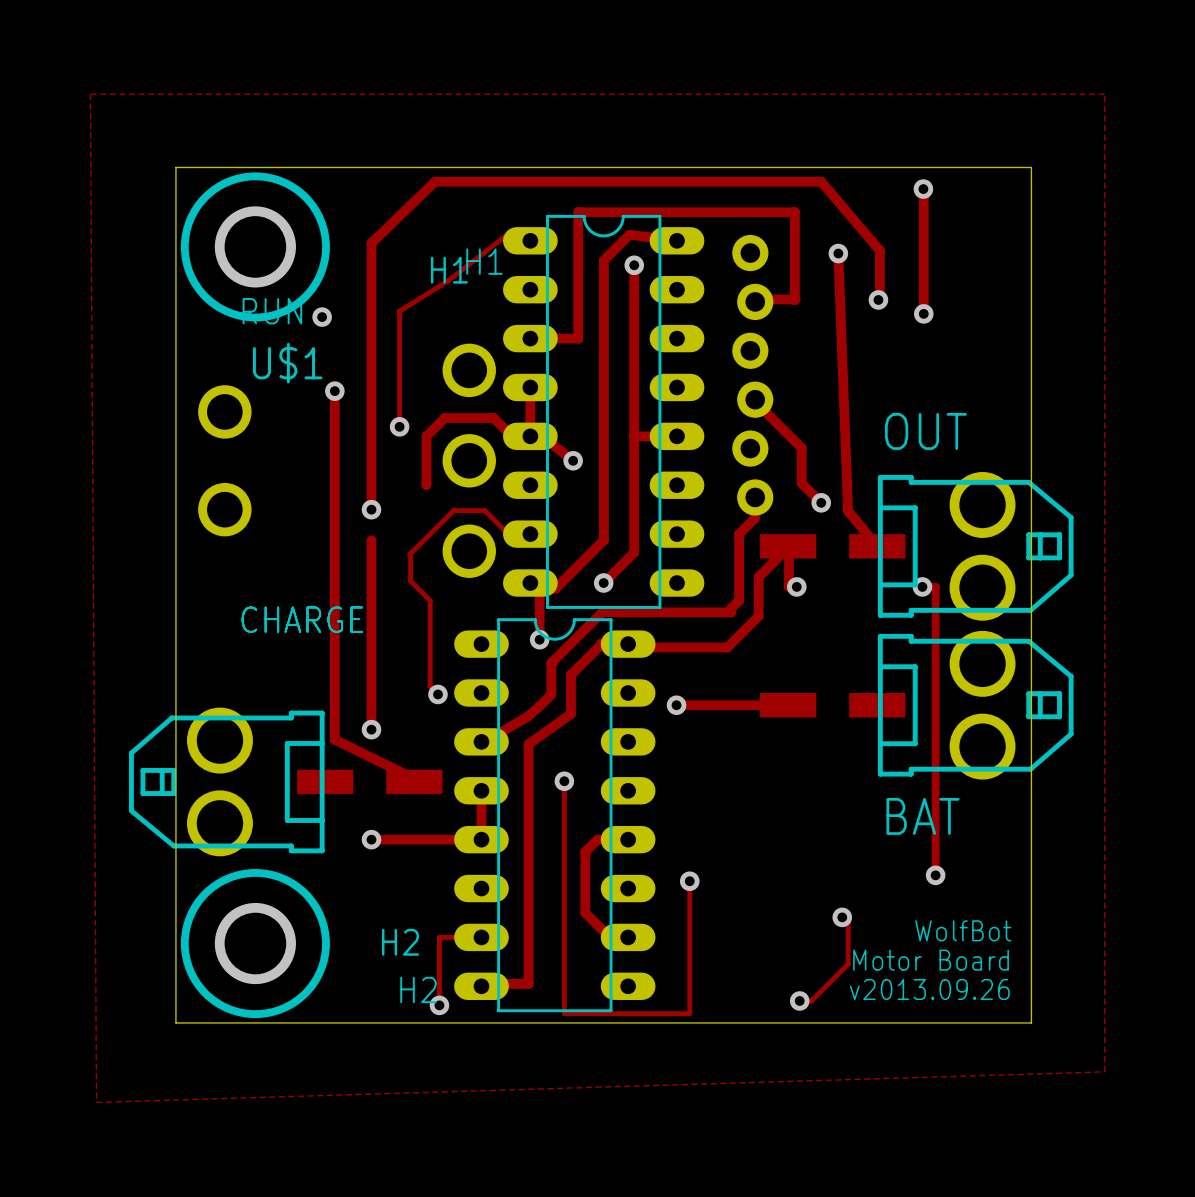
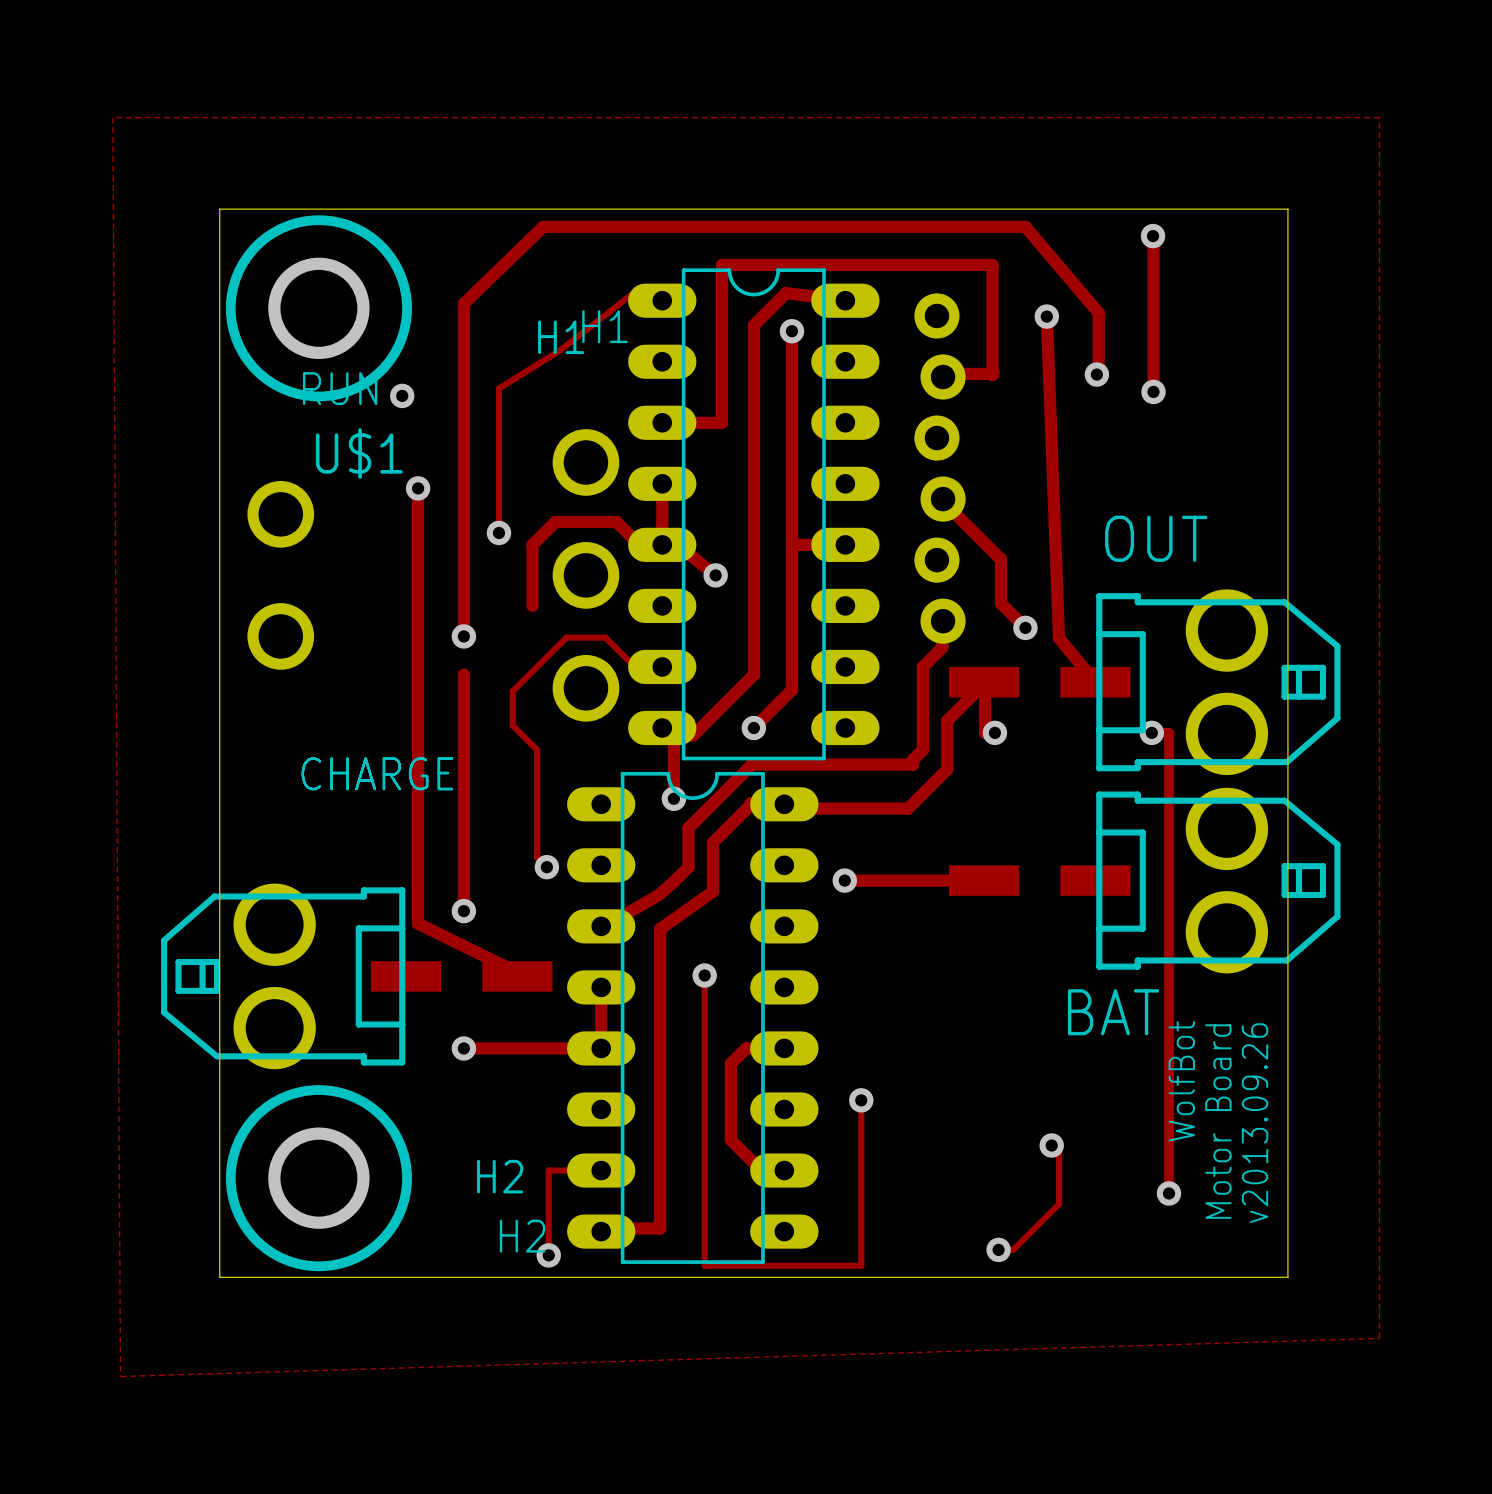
track: (935, 586) (935, 875) -> (1168, 732) (1168, 1193)
text position: BAT (923, 816) -> BAT (1113, 1012)
via position: (935, 875) -> (1168, 1193)
text rotation: 0° (963, 930) -> 90° counterclockwise (1181, 1081)
text rotation: 0° (931, 960) -> 90° counterclockwise (1218, 1121)
text rotation: 0° (929, 989) -> 90° counterclockwise (1255, 1123)

